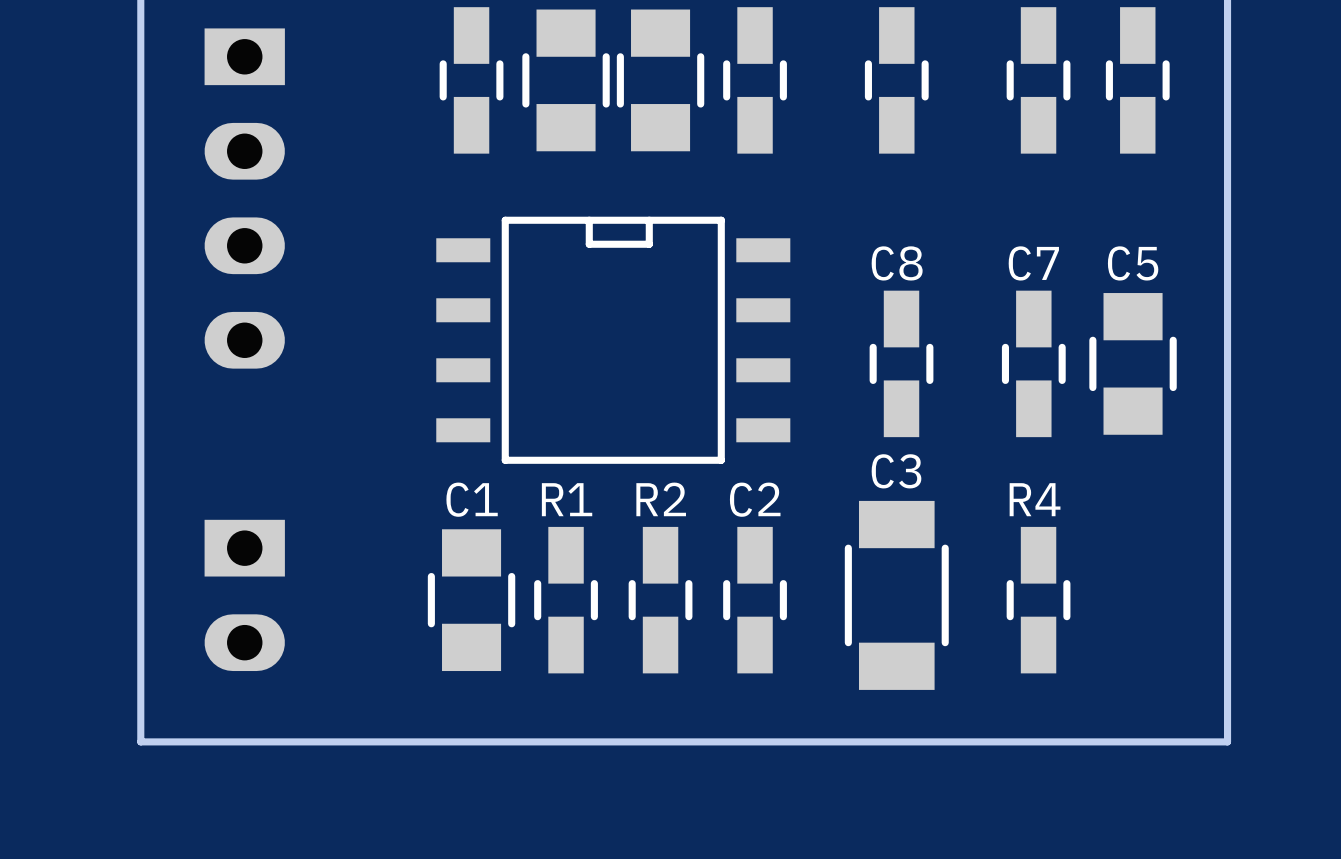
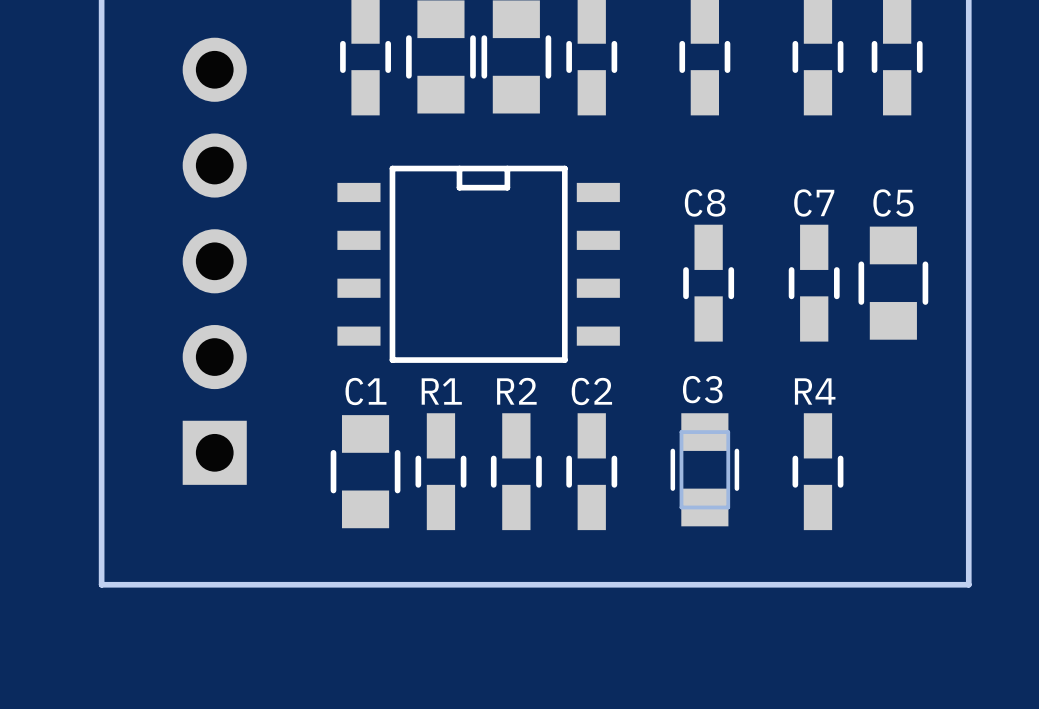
part: (244, 198) -> none
part: none -> (214, 261)
C3 footprint: [844, 500, 949, 690] -> [670, 413, 740, 527]
part: (244, 595) -> none

